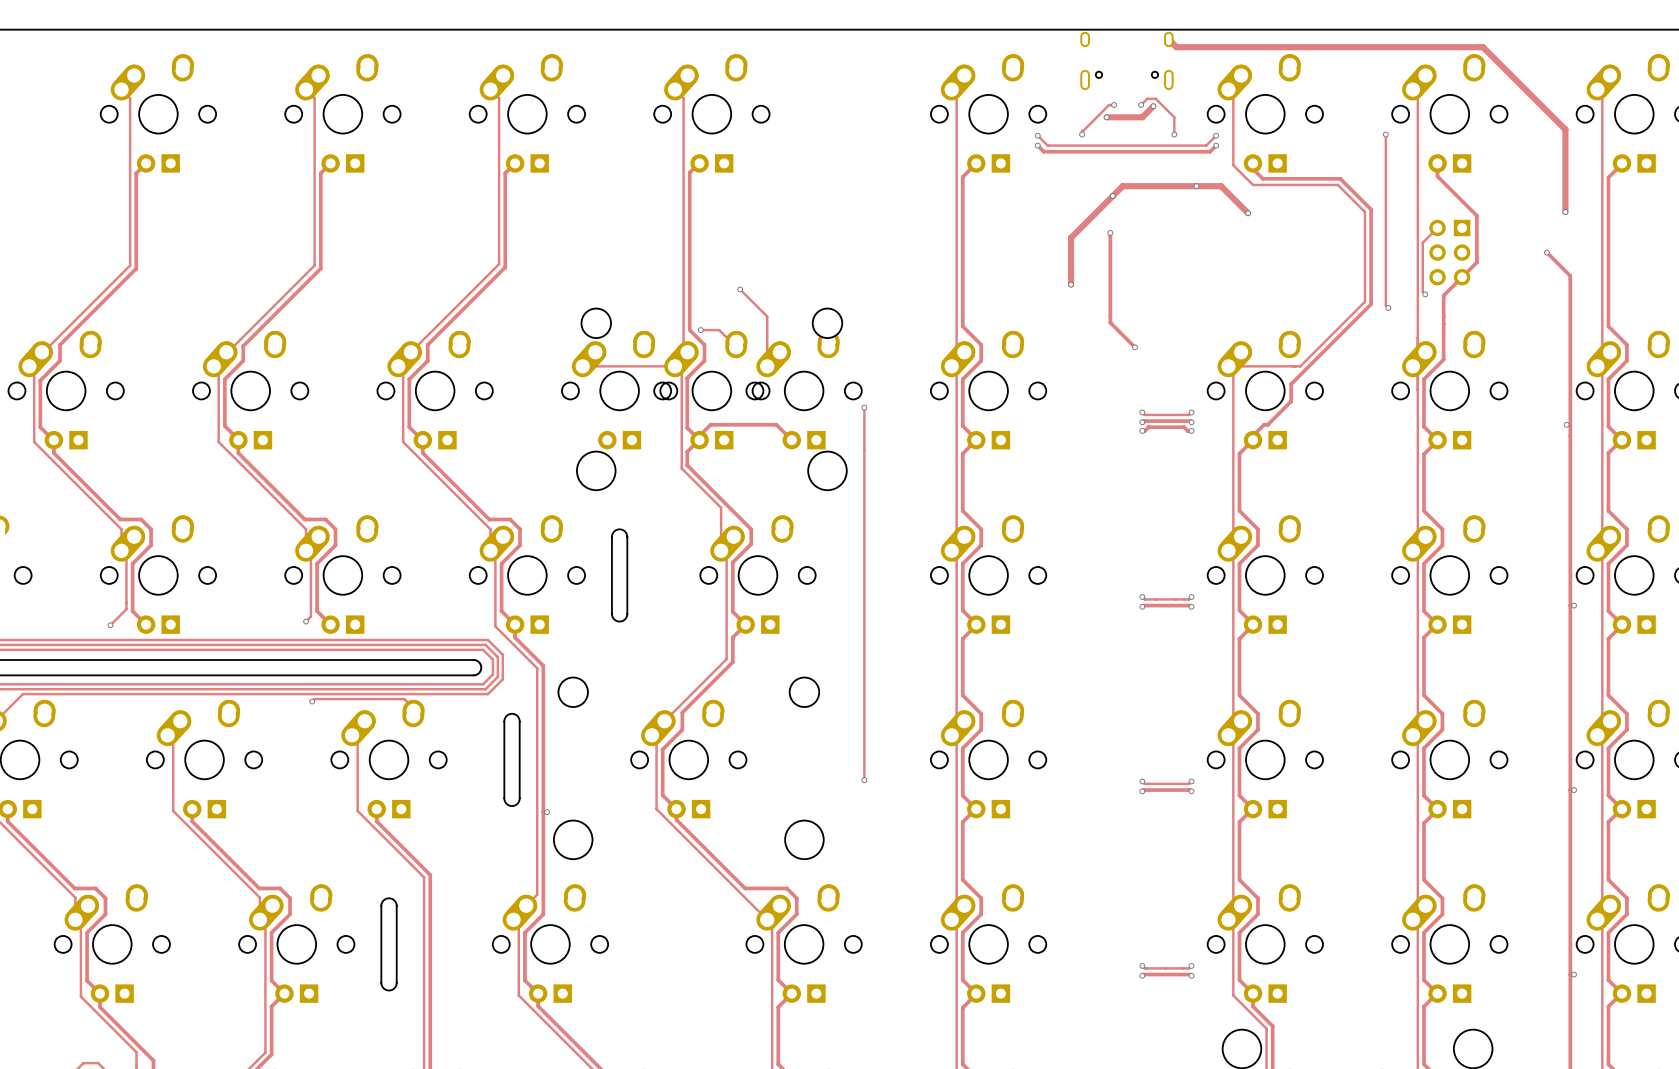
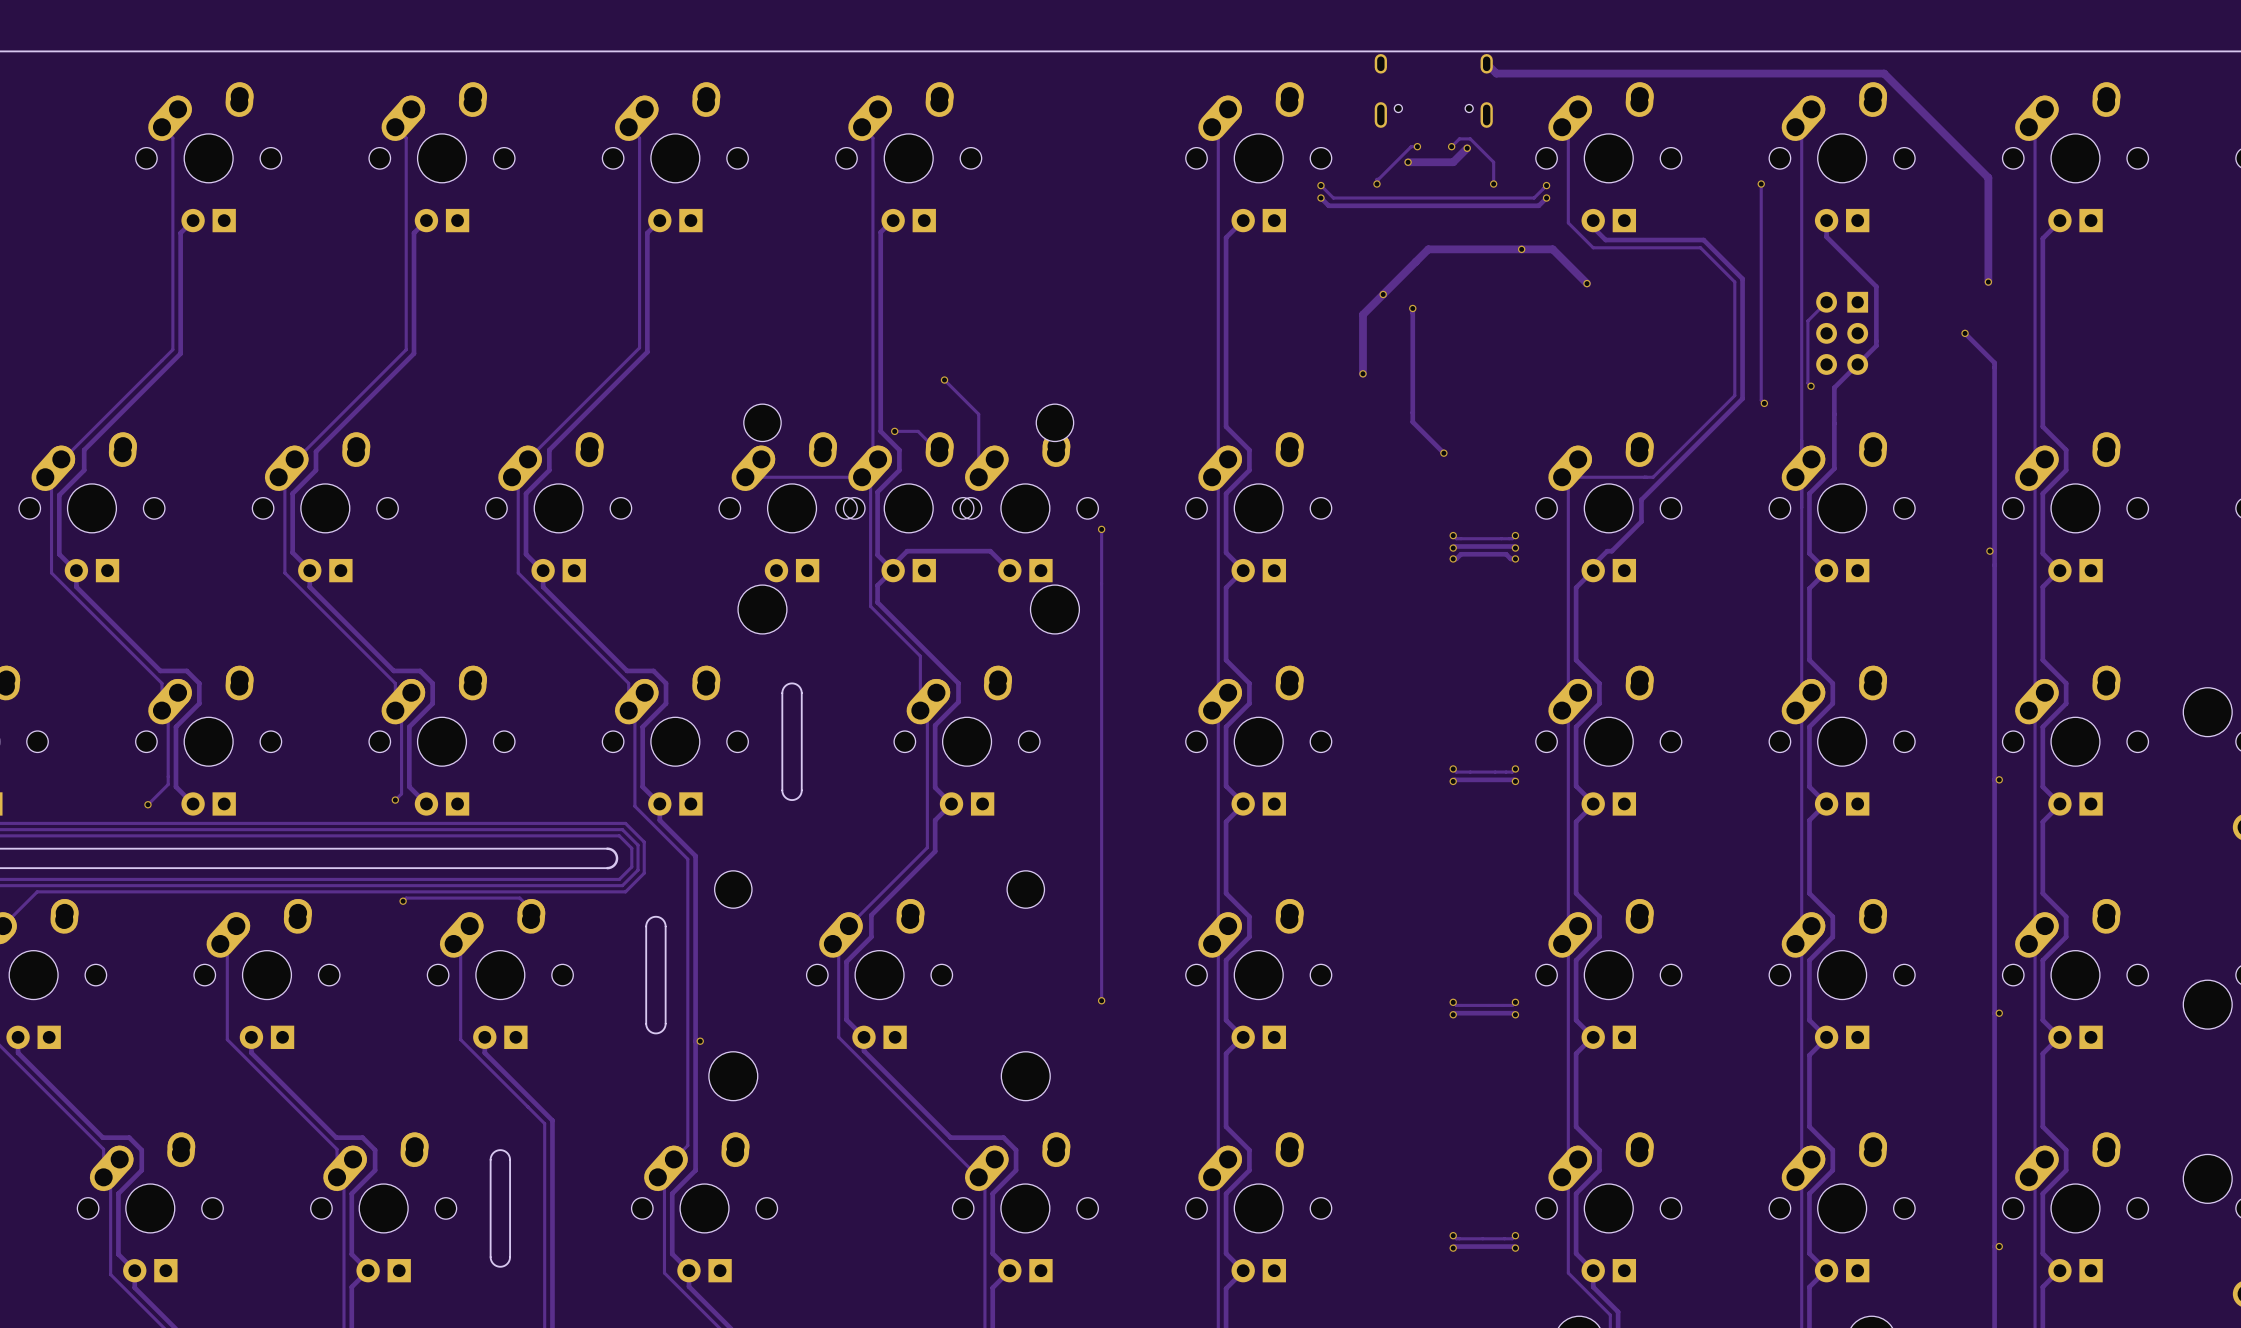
via position: (1112, 196) -> (1383, 294)

